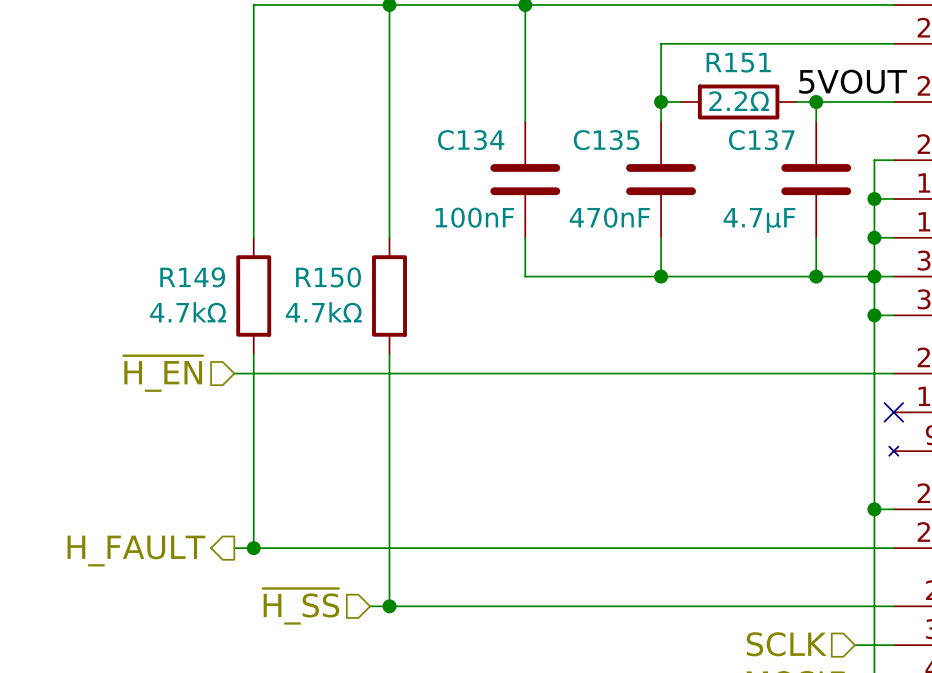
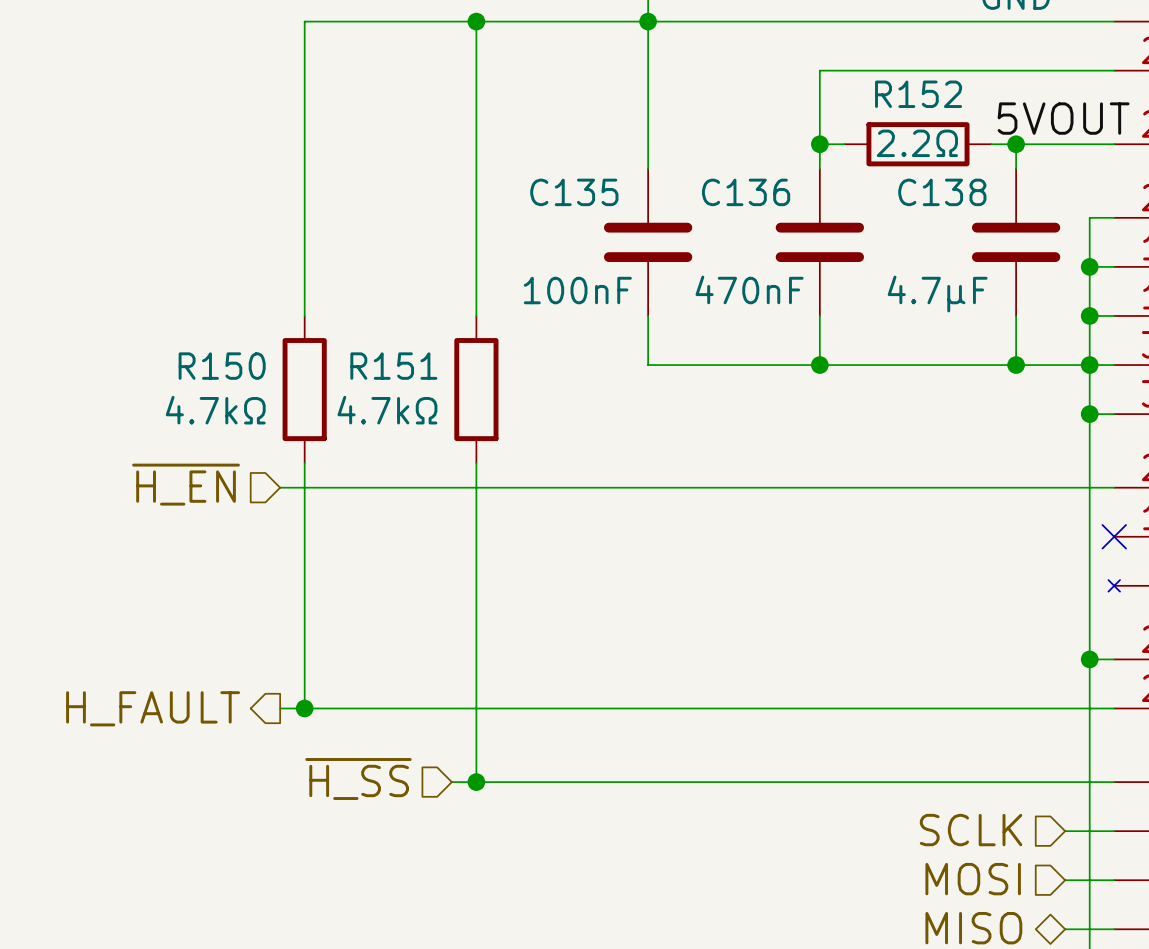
R151 name: R151 (738, 62) -> R152 (918, 94)
C134 name: C134 (471, 140) -> C135 (574, 192)
C135 name: C135 (606, 140) -> C136 (746, 192)
C137 name: C137 (761, 140) -> C138 (942, 192)
R149 name: R149 (192, 277) -> R150 (222, 366)
R150 name: R150 (328, 277) -> R151 (393, 366)

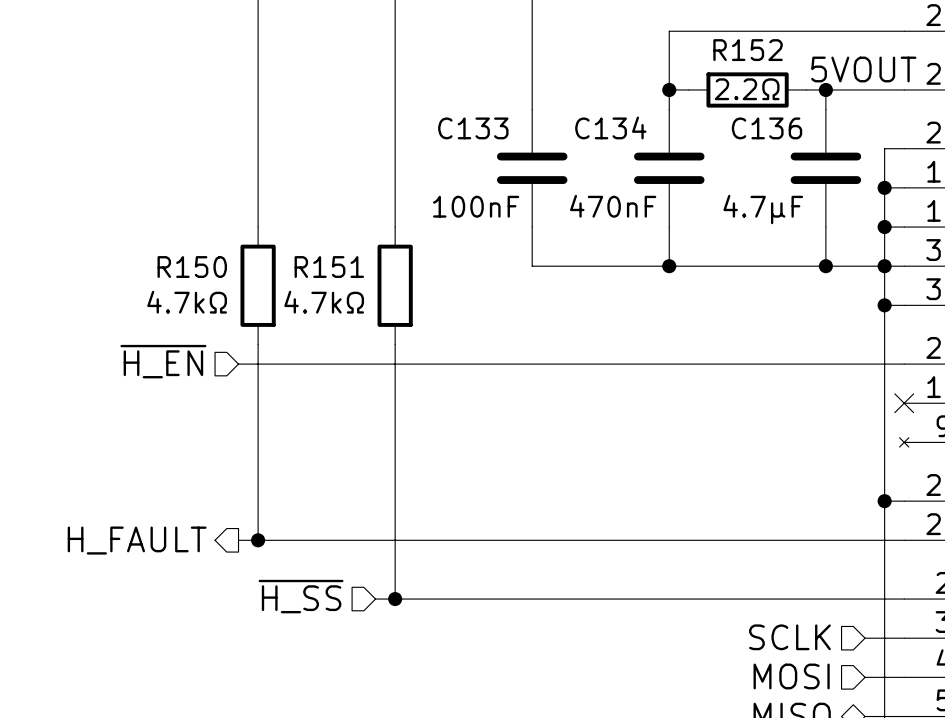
C135 name: C135 (574, 192) -> C133 (473, 128)
C136 name: C136 (746, 192) -> C134 (610, 127)
C138 name: C138 (942, 192) -> C136 (767, 128)

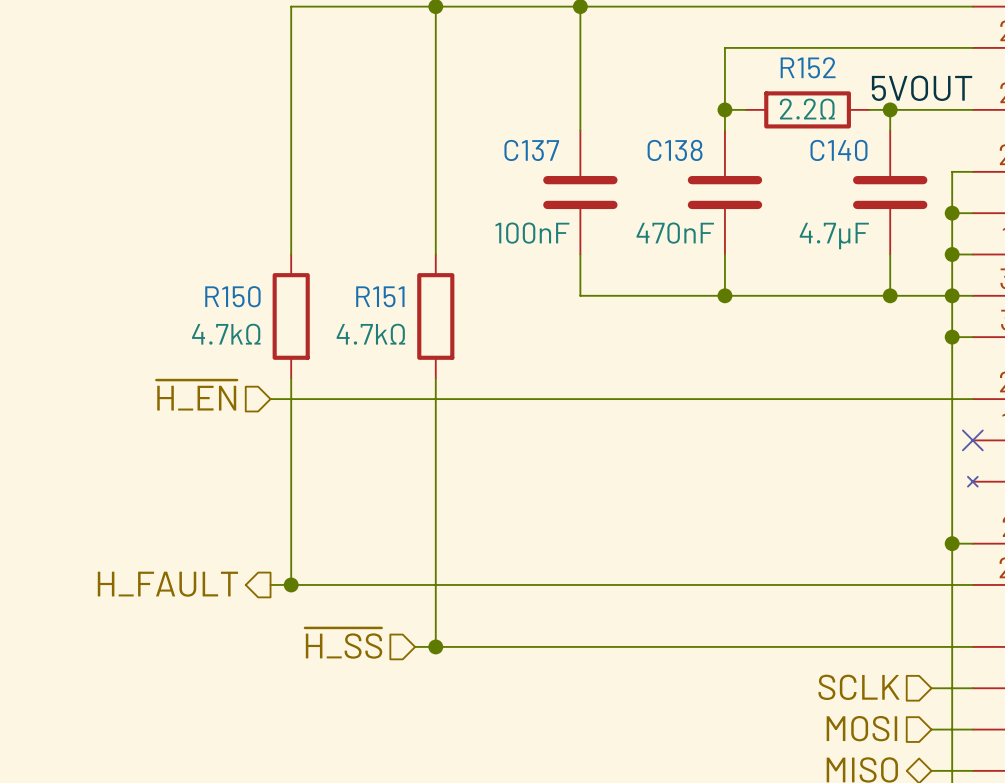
C134 name: C134 (610, 127) -> C138 (675, 150)
C133 name: C133 (473, 128) -> C137 (531, 150)
C136 name: C136 (767, 128) -> C140 (838, 150)

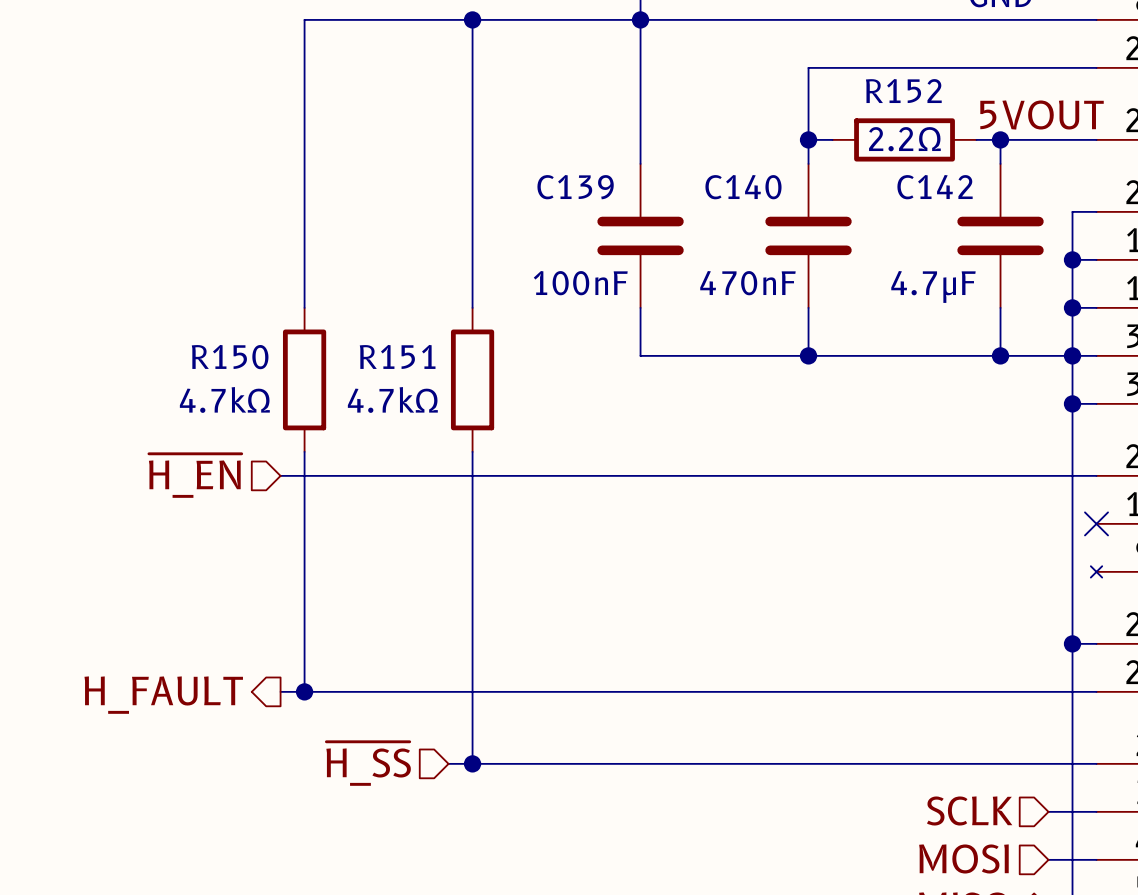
C137 name: C137 (531, 150) -> C139 (575, 187)
C138 name: C138 (675, 150) -> C140 (743, 187)
C140 name: C140 (838, 150) -> C142 (935, 187)

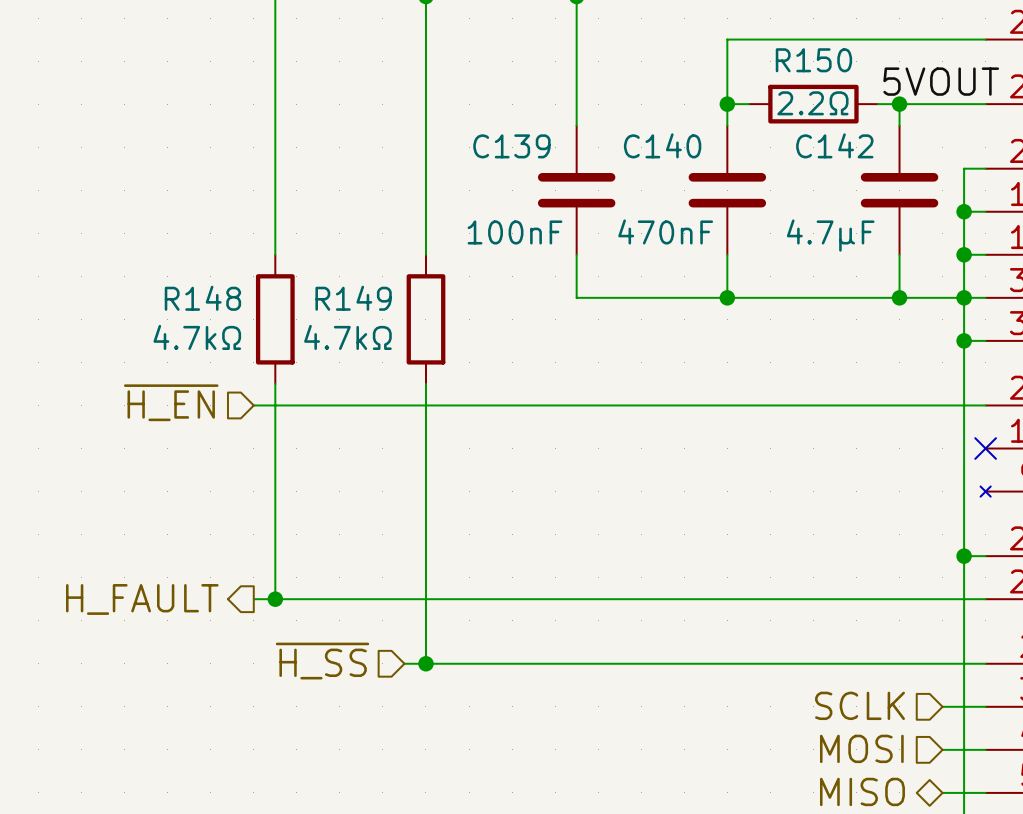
R152 name: R152 (903, 91) -> R150 (813, 60)
R151 name: R151 (397, 356) -> R149 (353, 298)
R150 name: R150 (230, 357) -> R148 (202, 298)

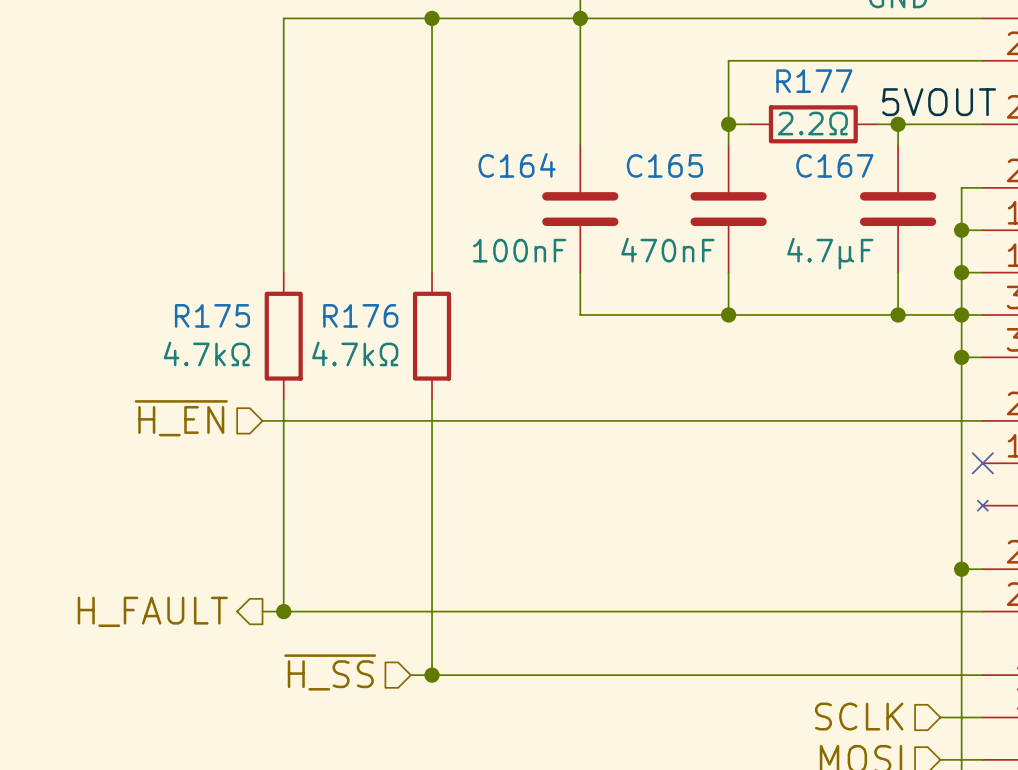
R150 name: R150 (813, 60) -> R177 (814, 81)
C140 name: C140 (662, 145) -> C165 (664, 165)
C142 name: C142 (834, 145) -> C167 (834, 165)
C139 name: C139 (511, 146) -> C164 (517, 165)
R148 name: R148 (202, 298) -> R175 (212, 315)
R149 name: R149 (353, 298) -> R176 (360, 315)

